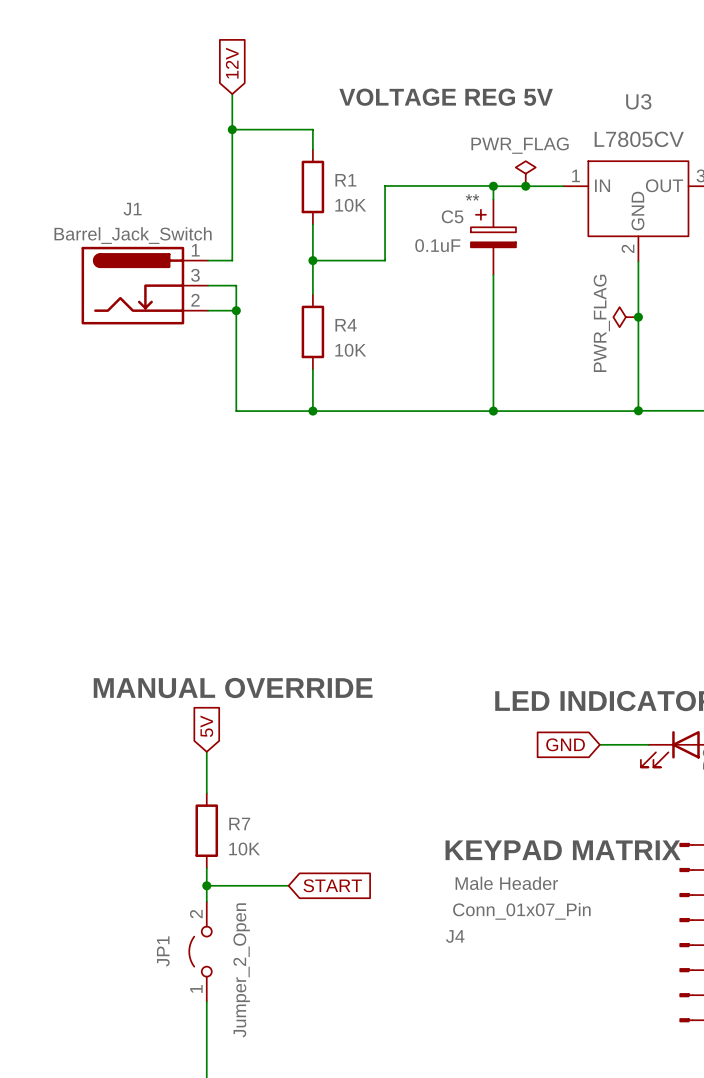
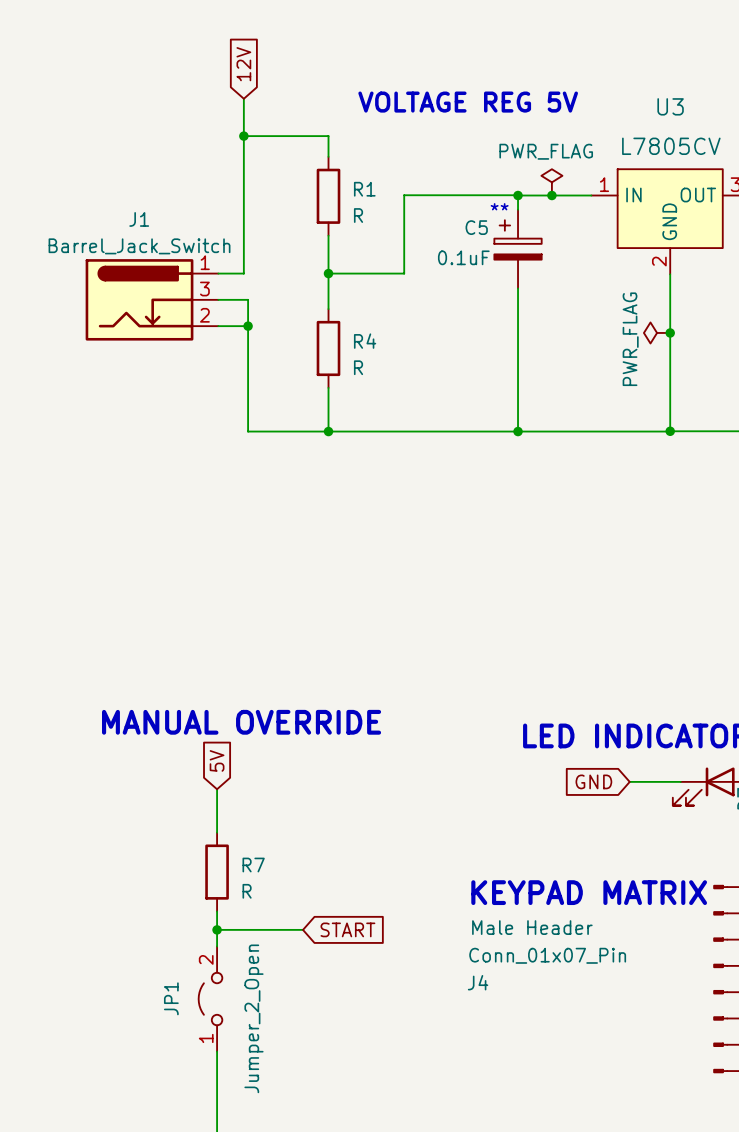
R1 value: 10K (350, 205) -> R (358, 215)
R4 value: 10K (350, 350) -> R (358, 367)
R7 value: 10K (244, 849) -> R (247, 891)

